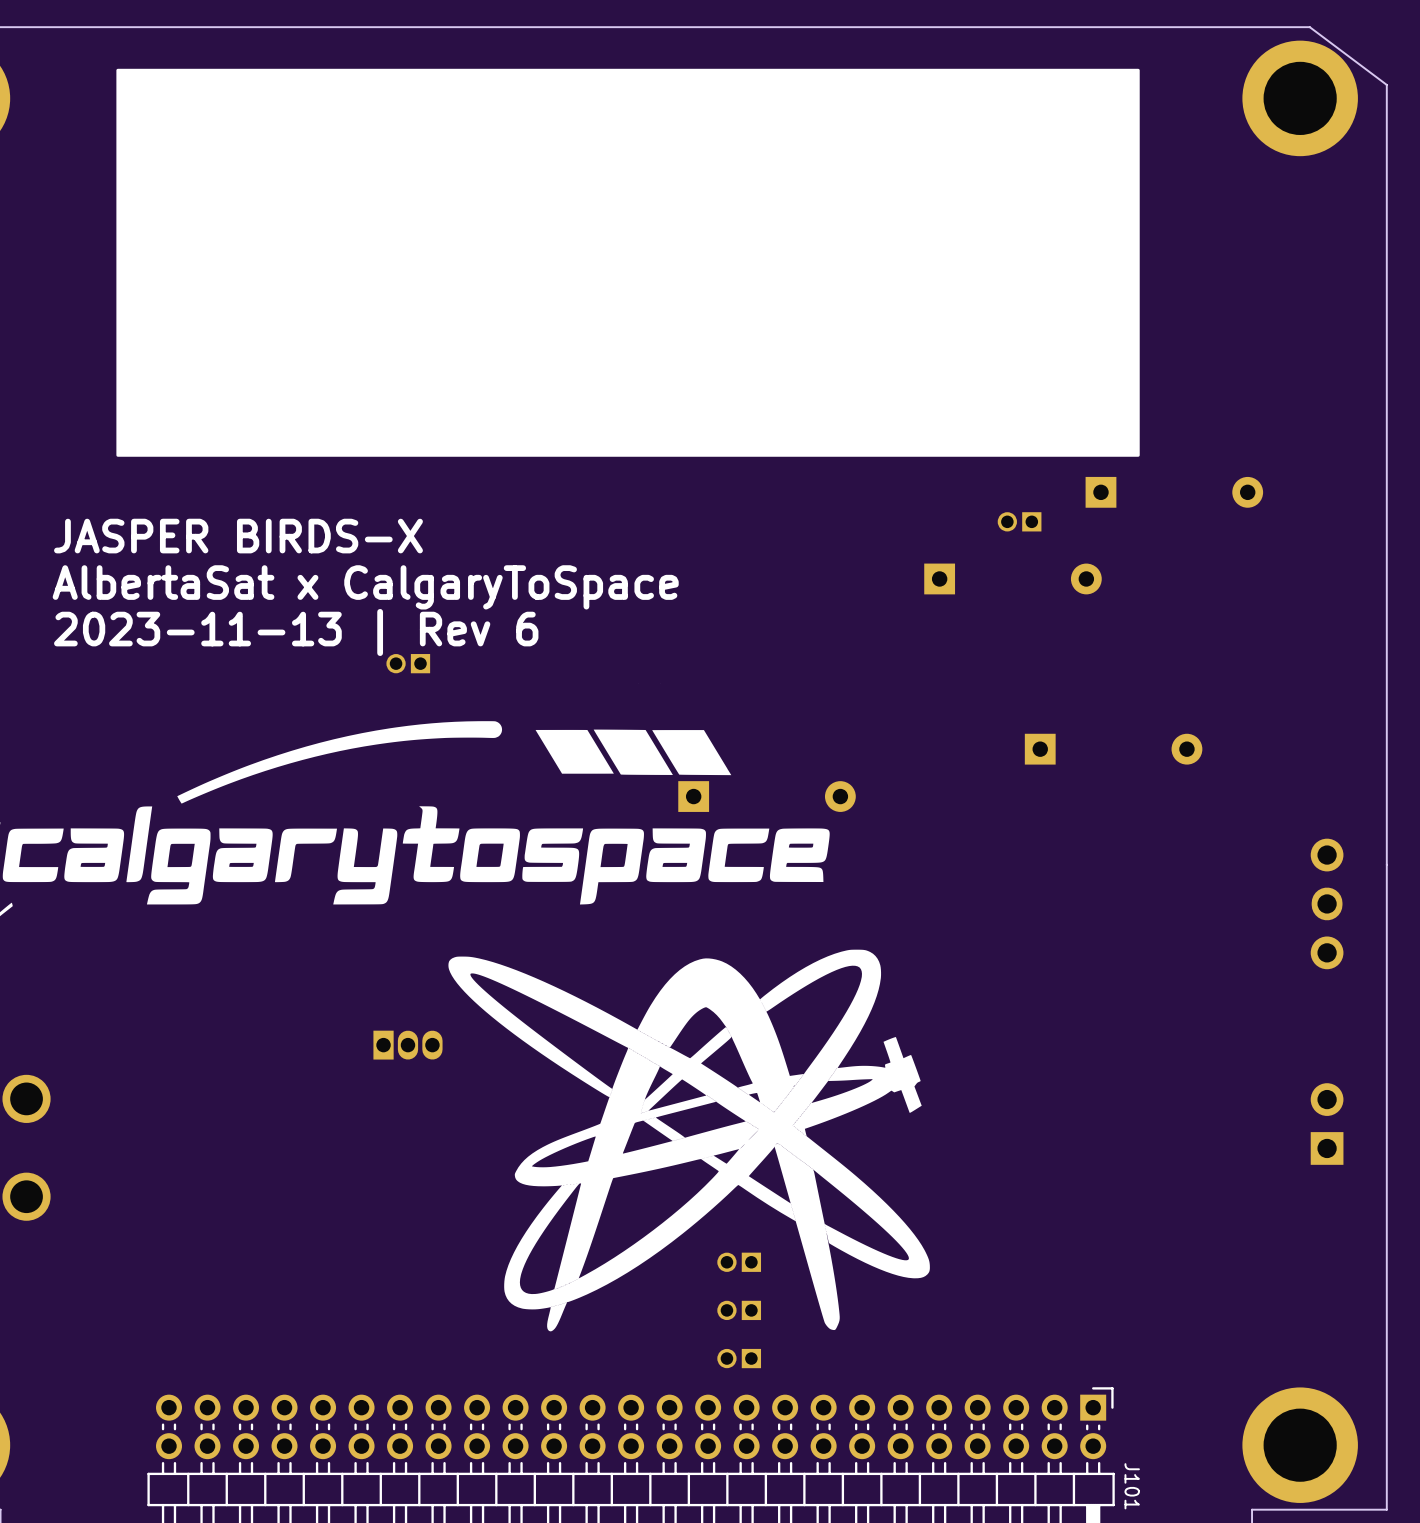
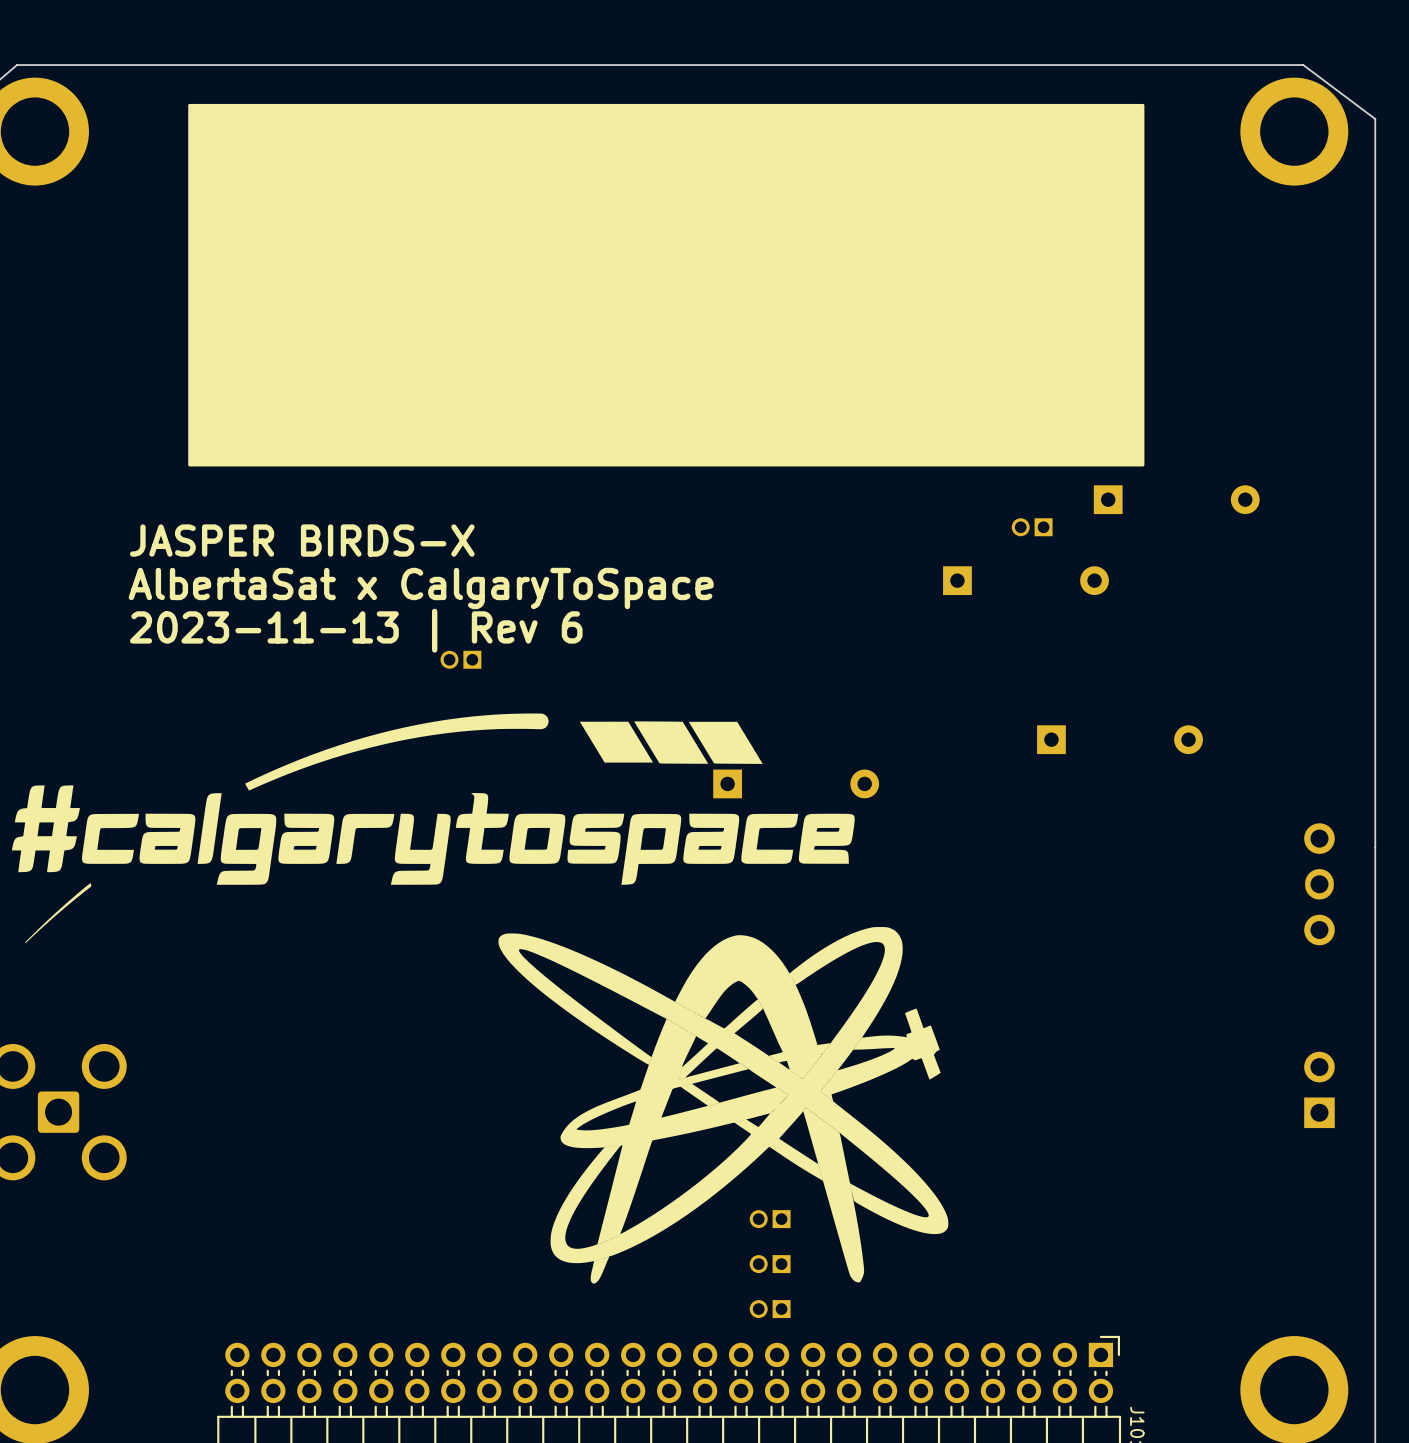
part: (407, 1045) -> none

